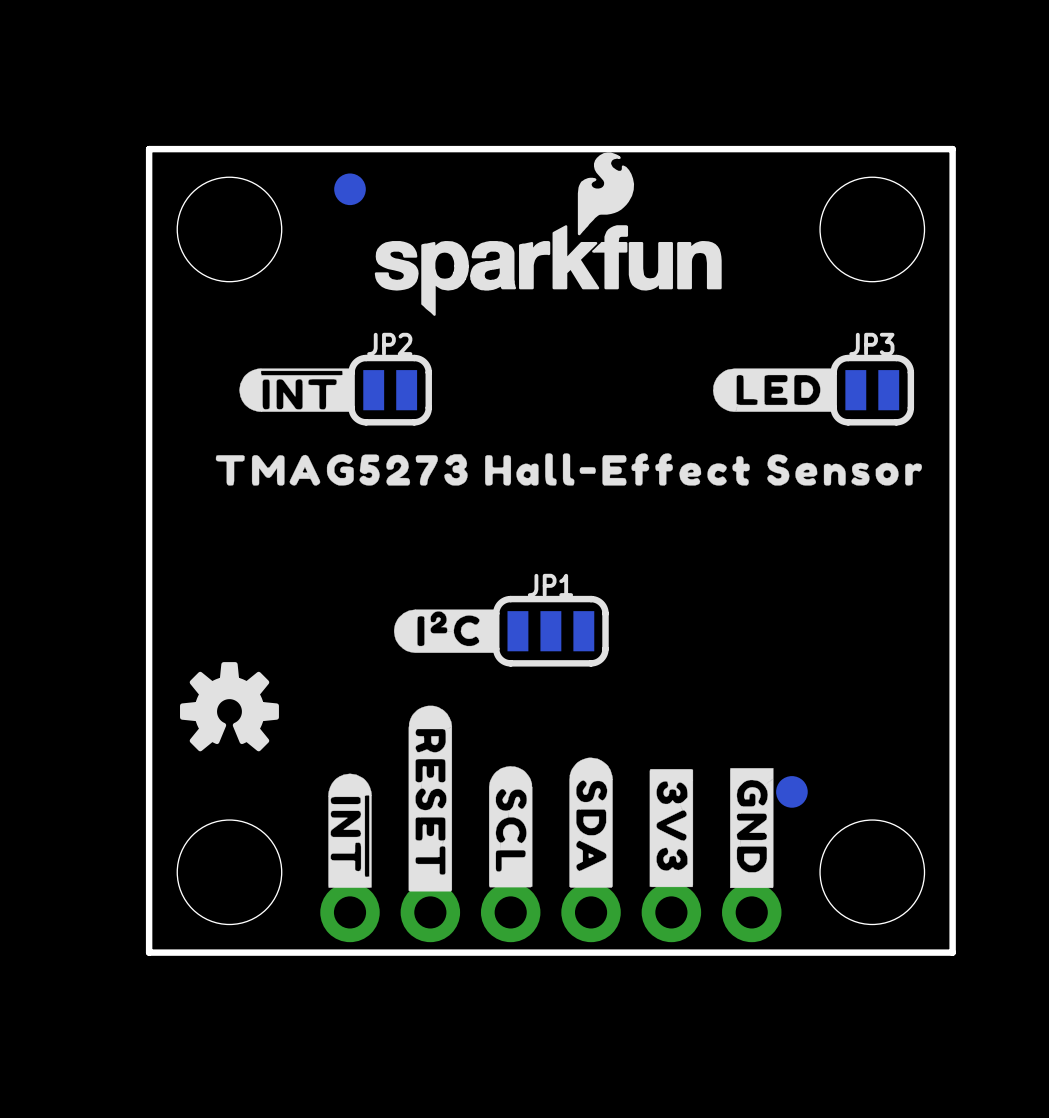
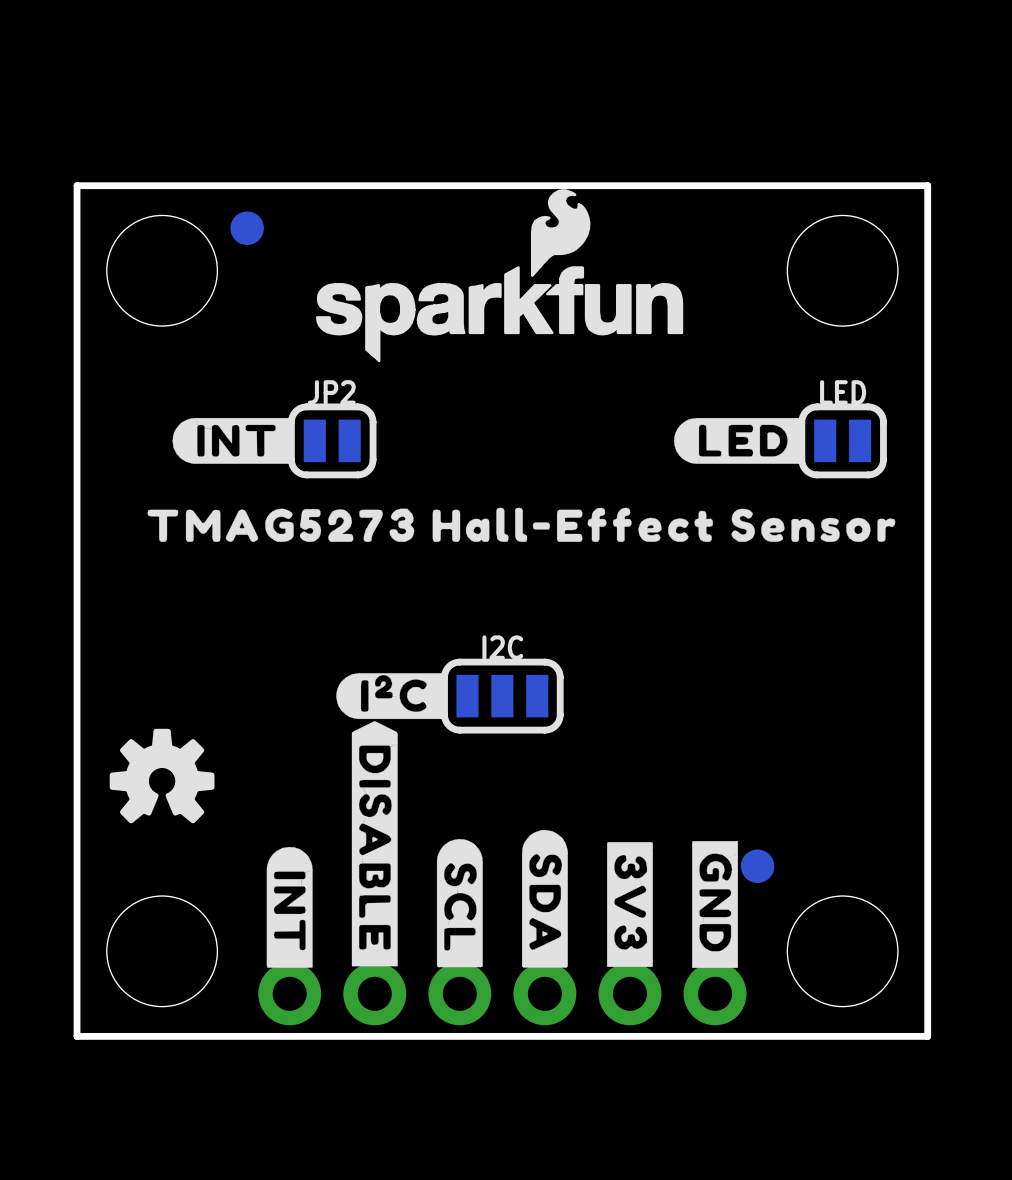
part position: (350, 189) -> (247, 228)
JP3 name: JP3 (871, 344) -> LED (843, 392)
drawing shape: [239, 368, 354, 412] -> [172, 417, 294, 464]
JP1 name: JP1 (550, 585) -> I2C (502, 647)
drawing shape: [408, 705, 453, 892] -> [351, 721, 398, 967]
drawing shape: [328, 773, 372, 888] -> [266, 846, 313, 968]

